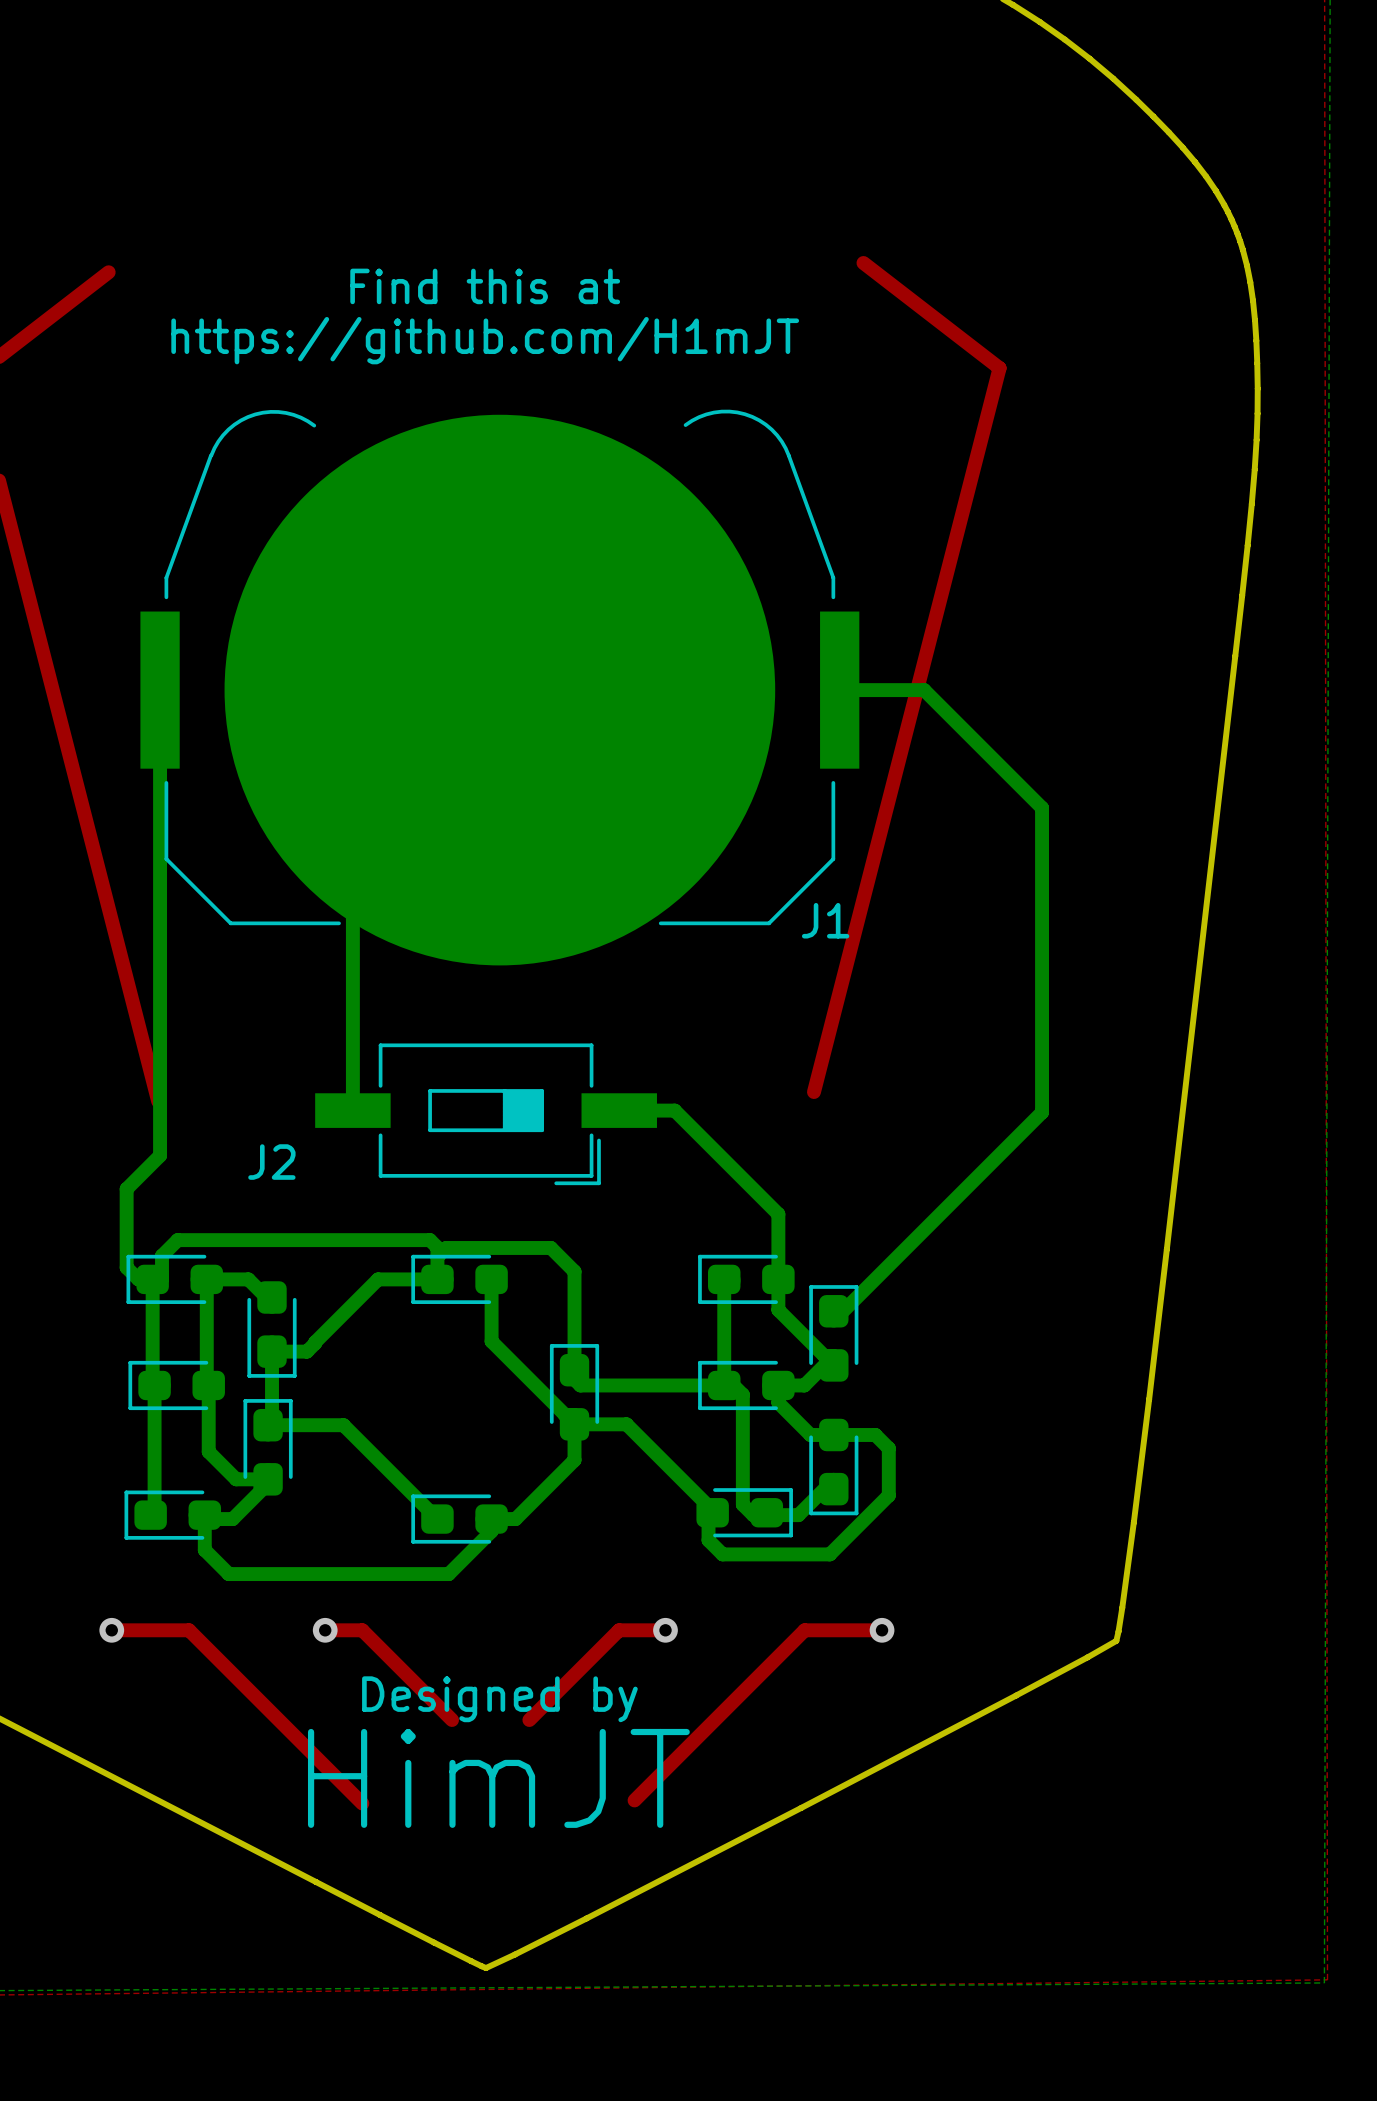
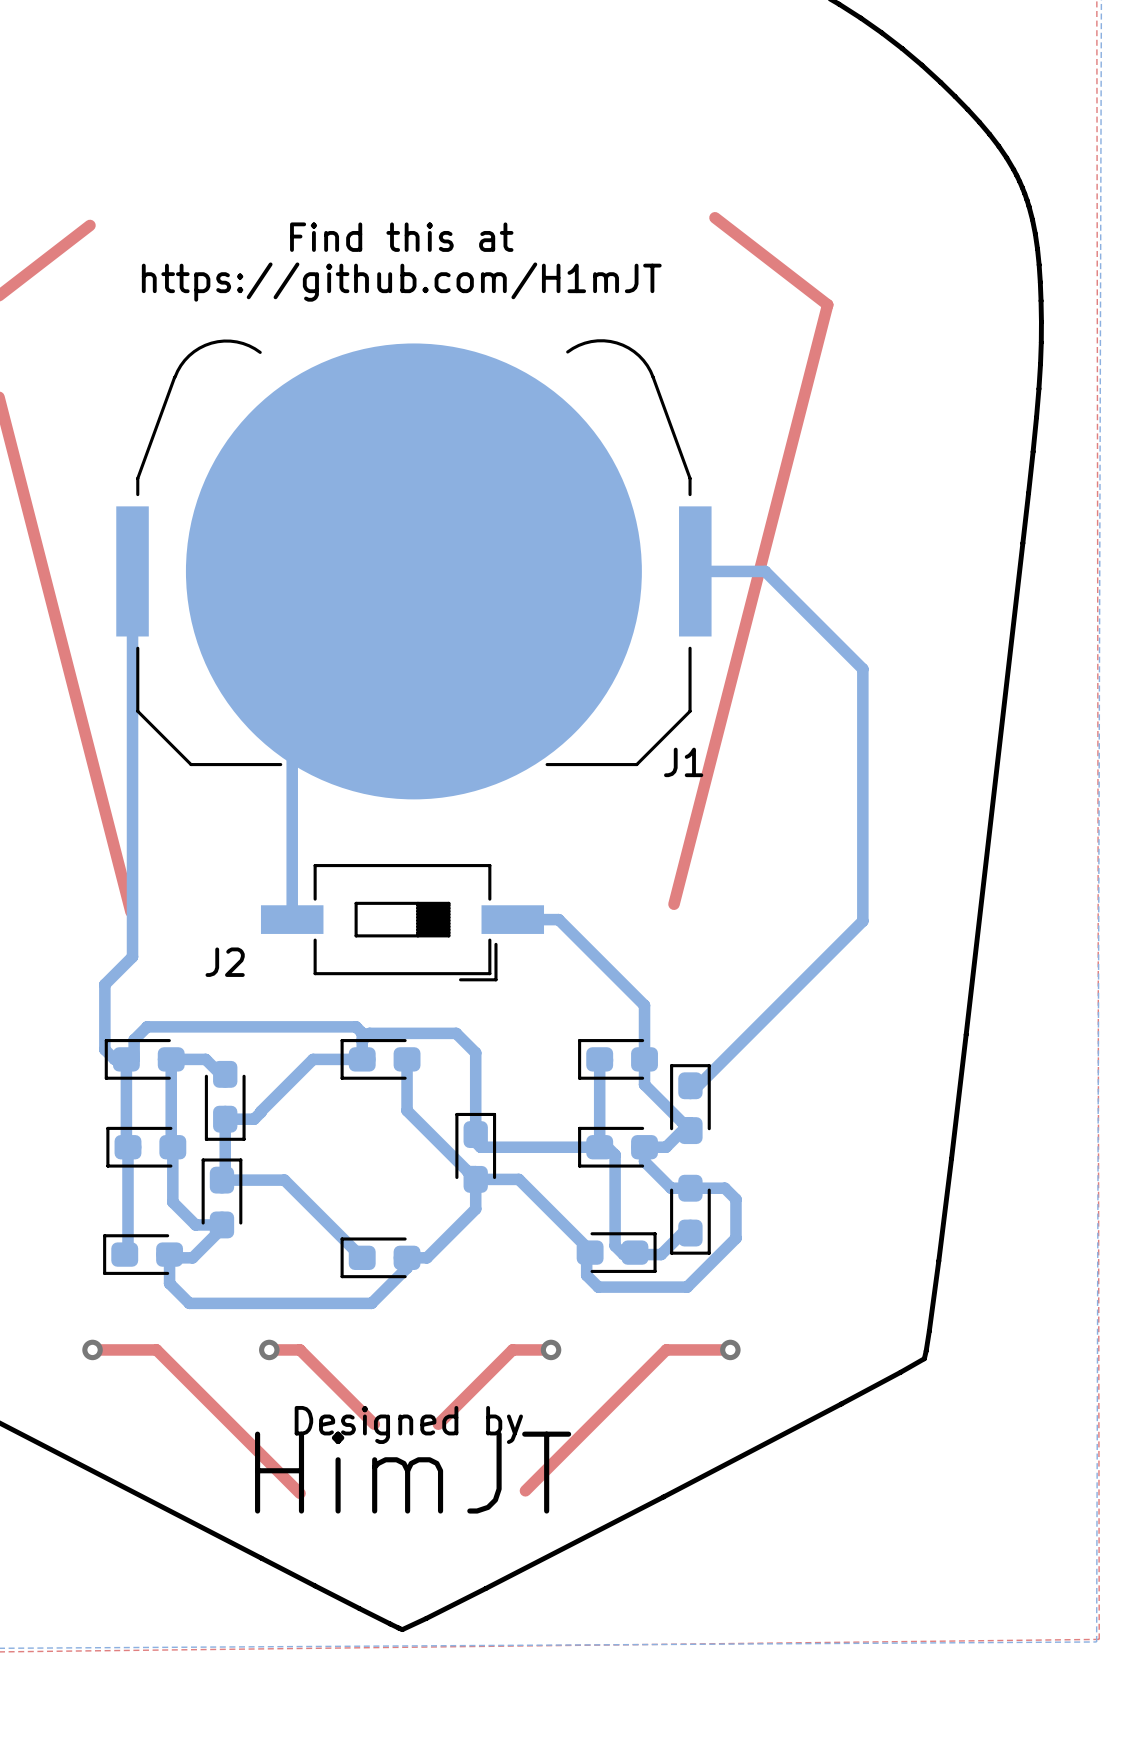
text position: Designed by (499, 1699) -> Designed by (408, 1424)

